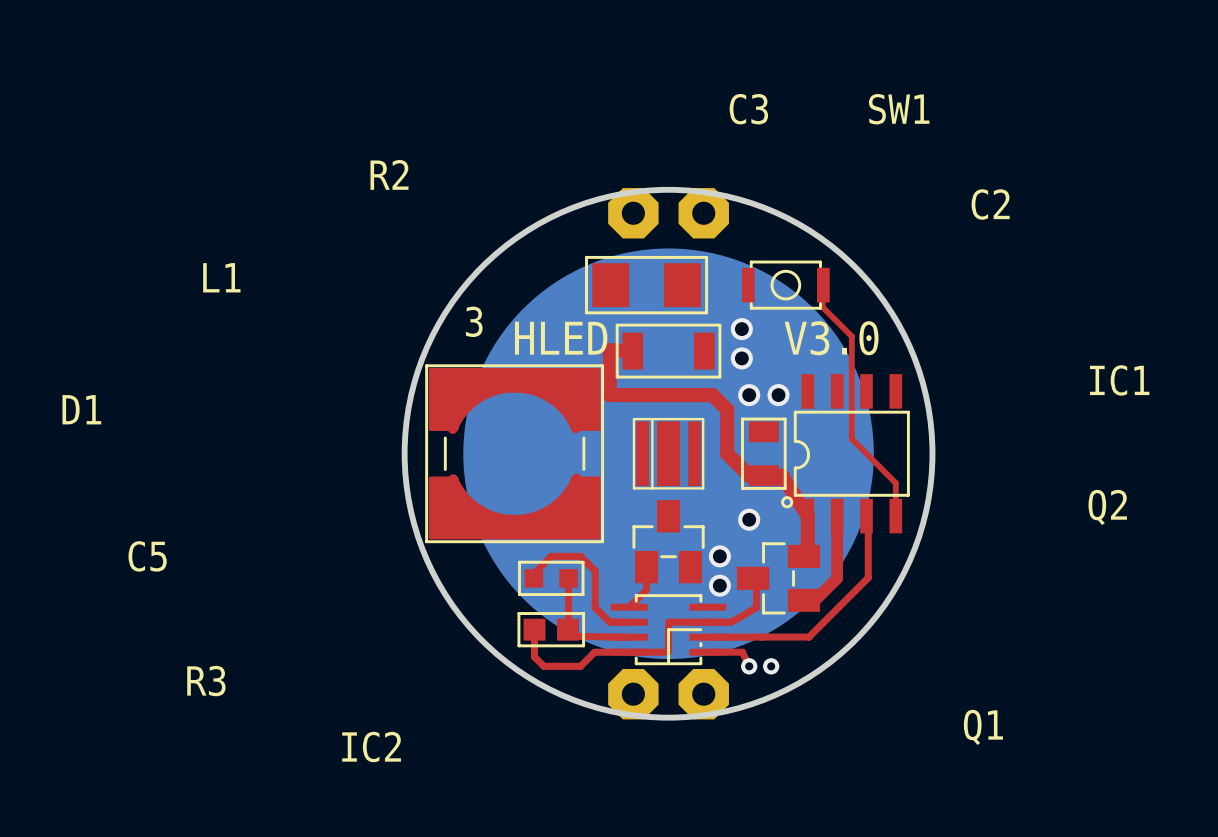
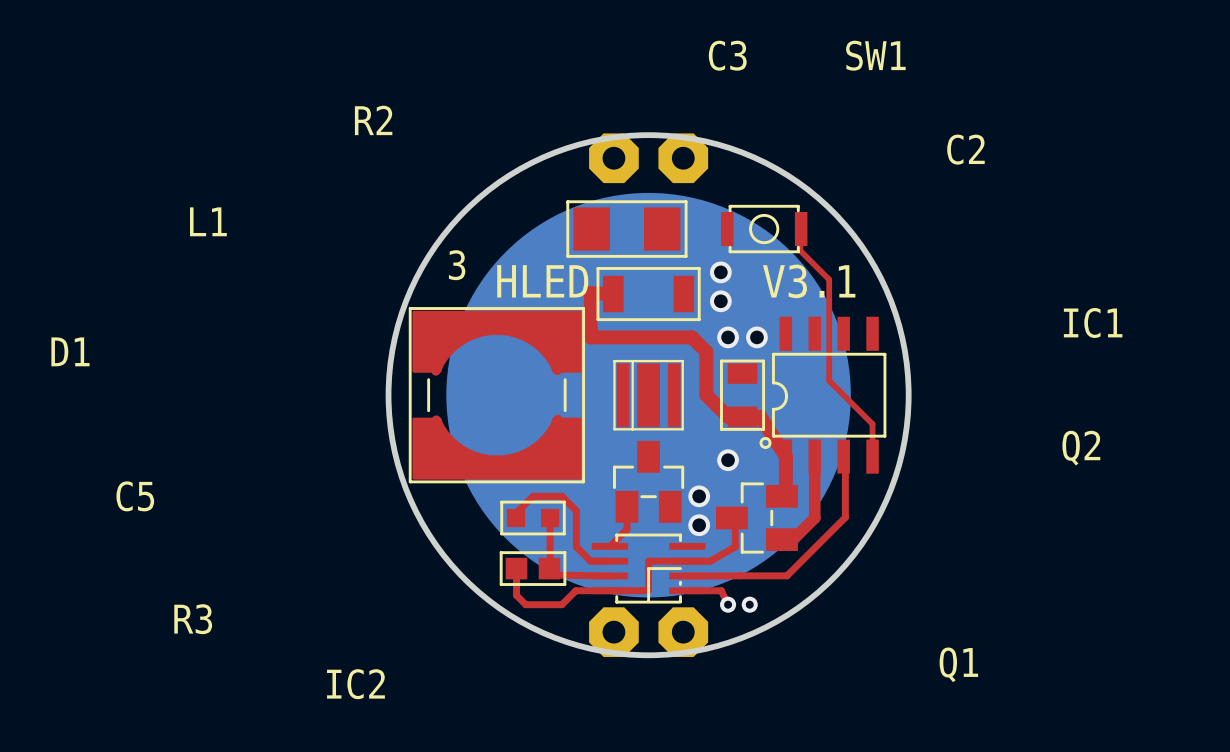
text: V3.0 (831, 338) -> V3.1 (809, 281)

